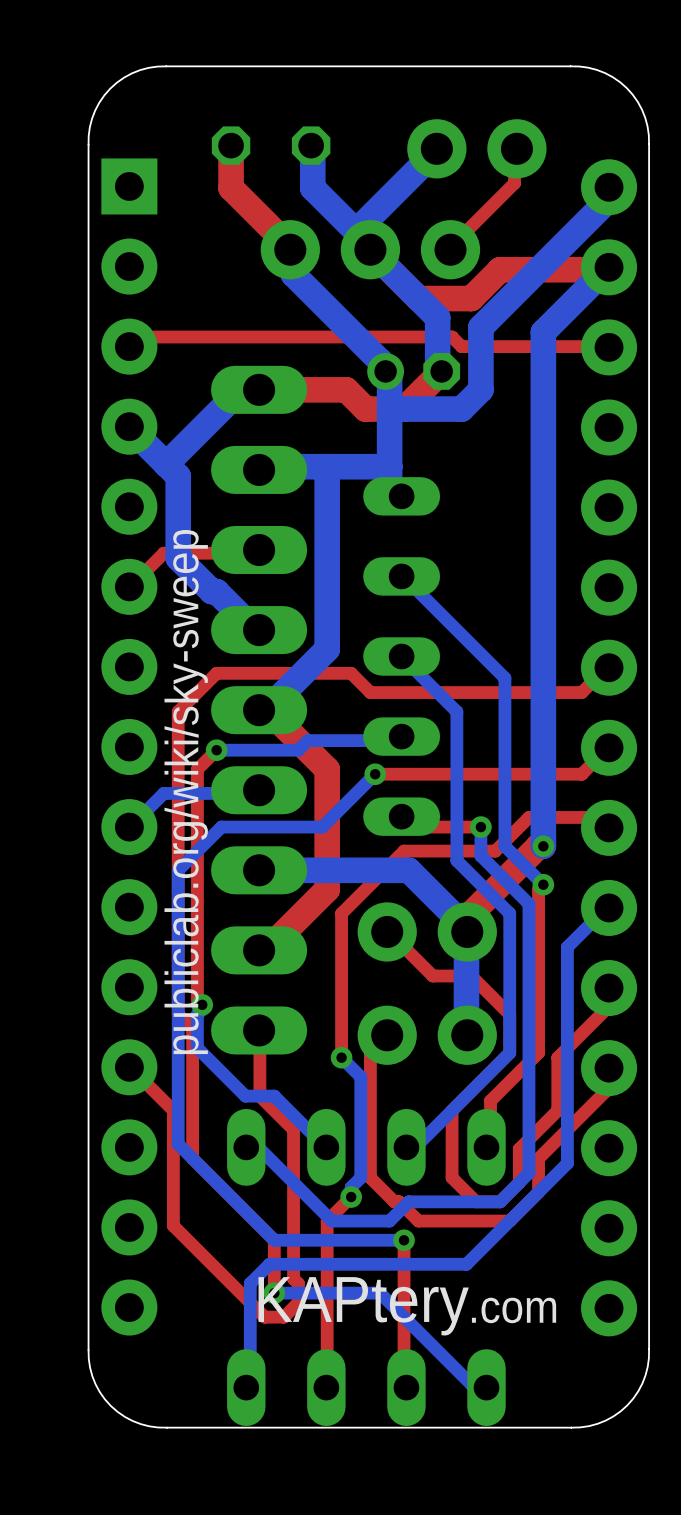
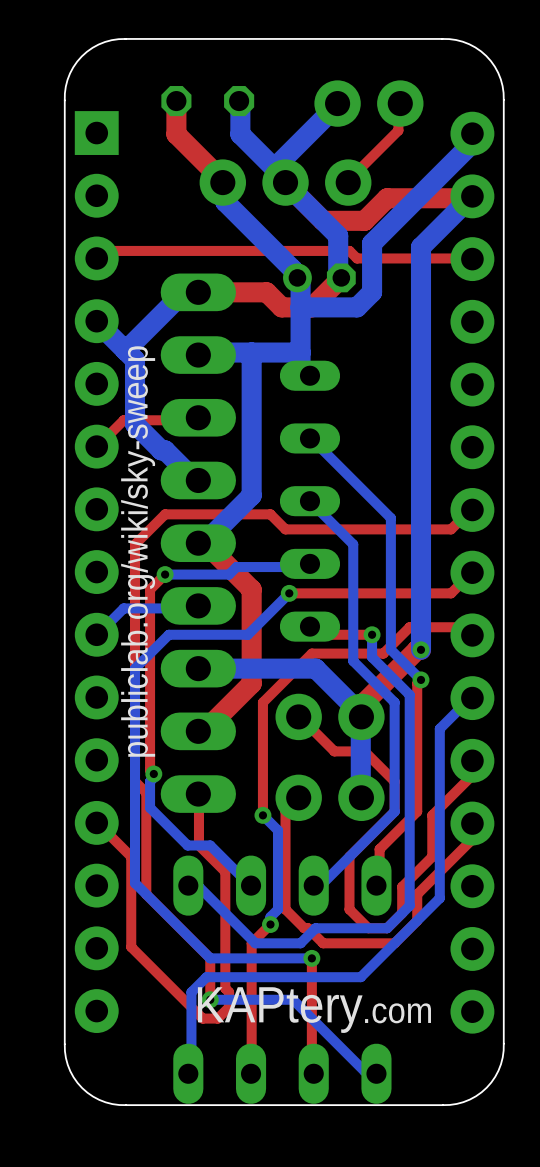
text position: publiclab.org/wiki/sky-sweep (186, 792) -> publiclab.org/wiki/sky-sweep (138, 551)

